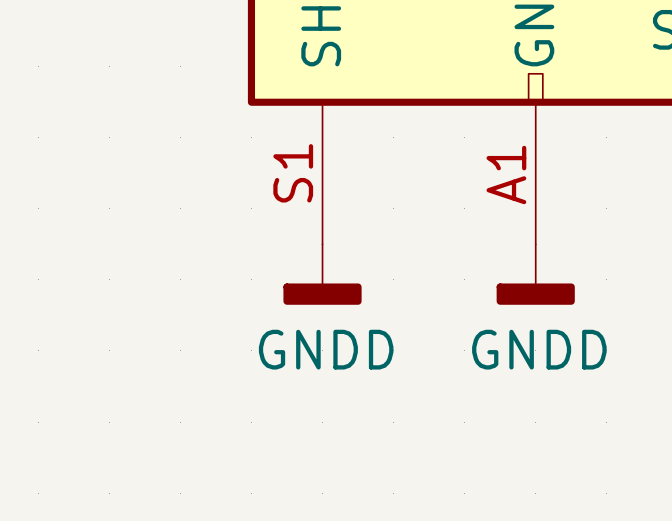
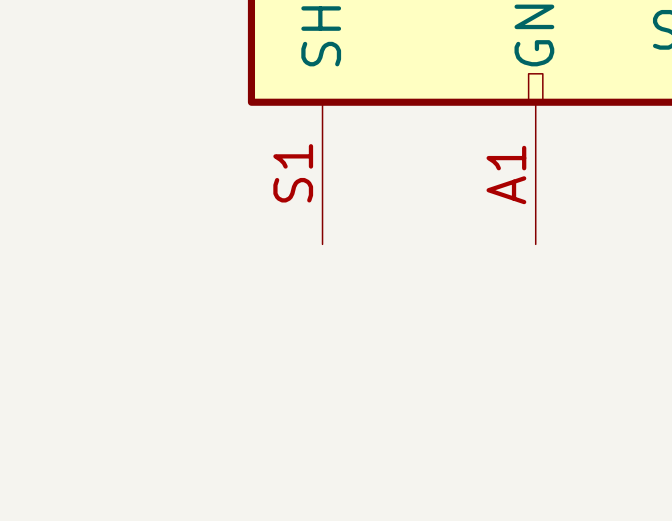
power symbol: GNDD (322, 274) -> none
power symbol: GNDD (535, 274) -> none

